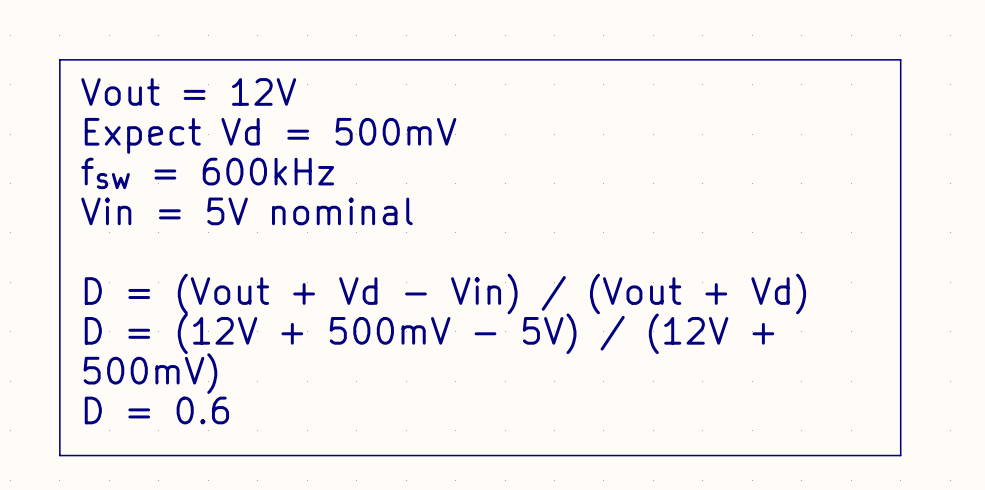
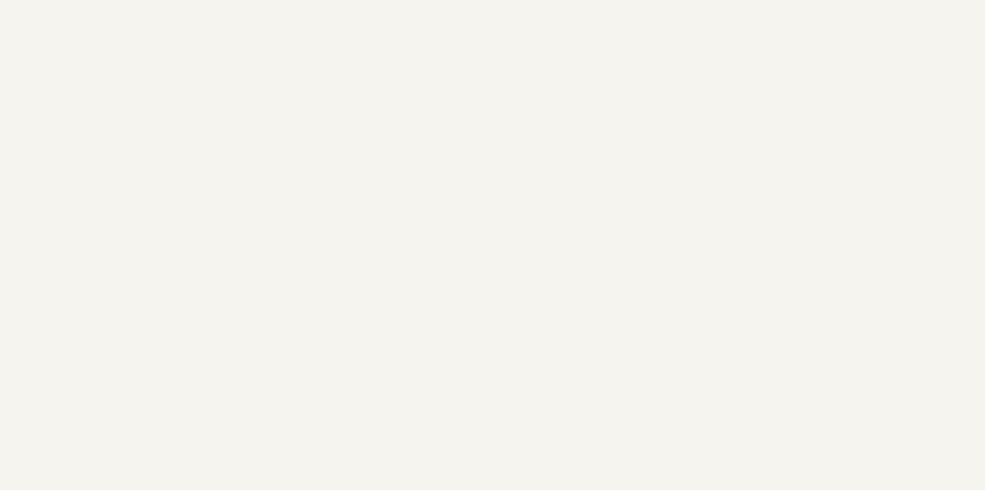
line: (59, 59) (900, 59) (900, 455) (59, 455) (59, 59) -> none
text: Vout = 12V (188, 91) -> none
text: Expect Vd = 500mV (270, 135) -> none
text: fsw = 600kHz (207, 173) -> none
text: Vin = 5V nominal (246, 211) -> none
text: D = (Vout + Vd - Vin) / (Vout + Vd) (445, 293) -> none
text: D = (12V + 500mV - 5V) / (12V + (429, 333) -> none
text: 500mV) (150, 373) -> none
text: D = 0.6 (156, 410) -> none

